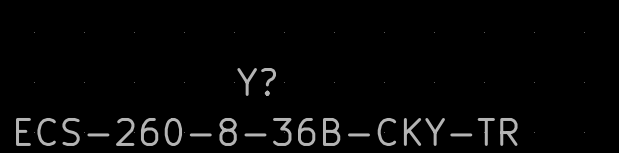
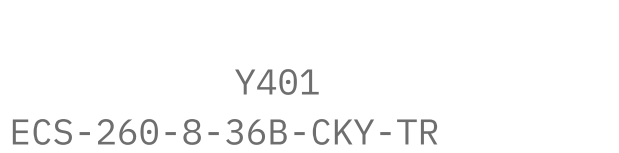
Y? name: Y? (256, 81) -> Y401 (276, 81)

